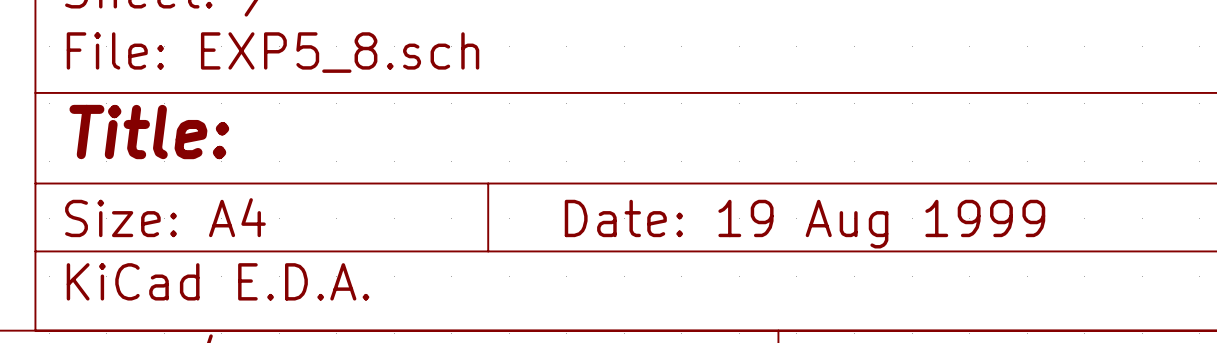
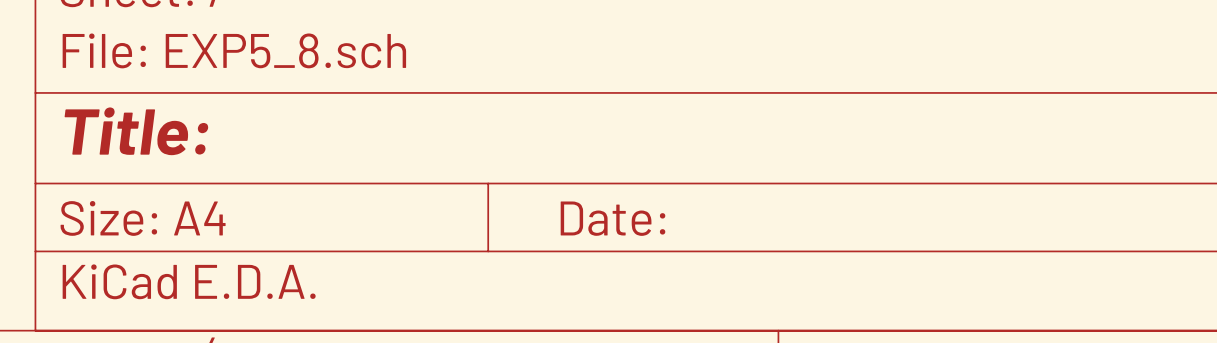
title block: Date: 19 Aug 1999 (804, 224) -> Date: (612, 218)

